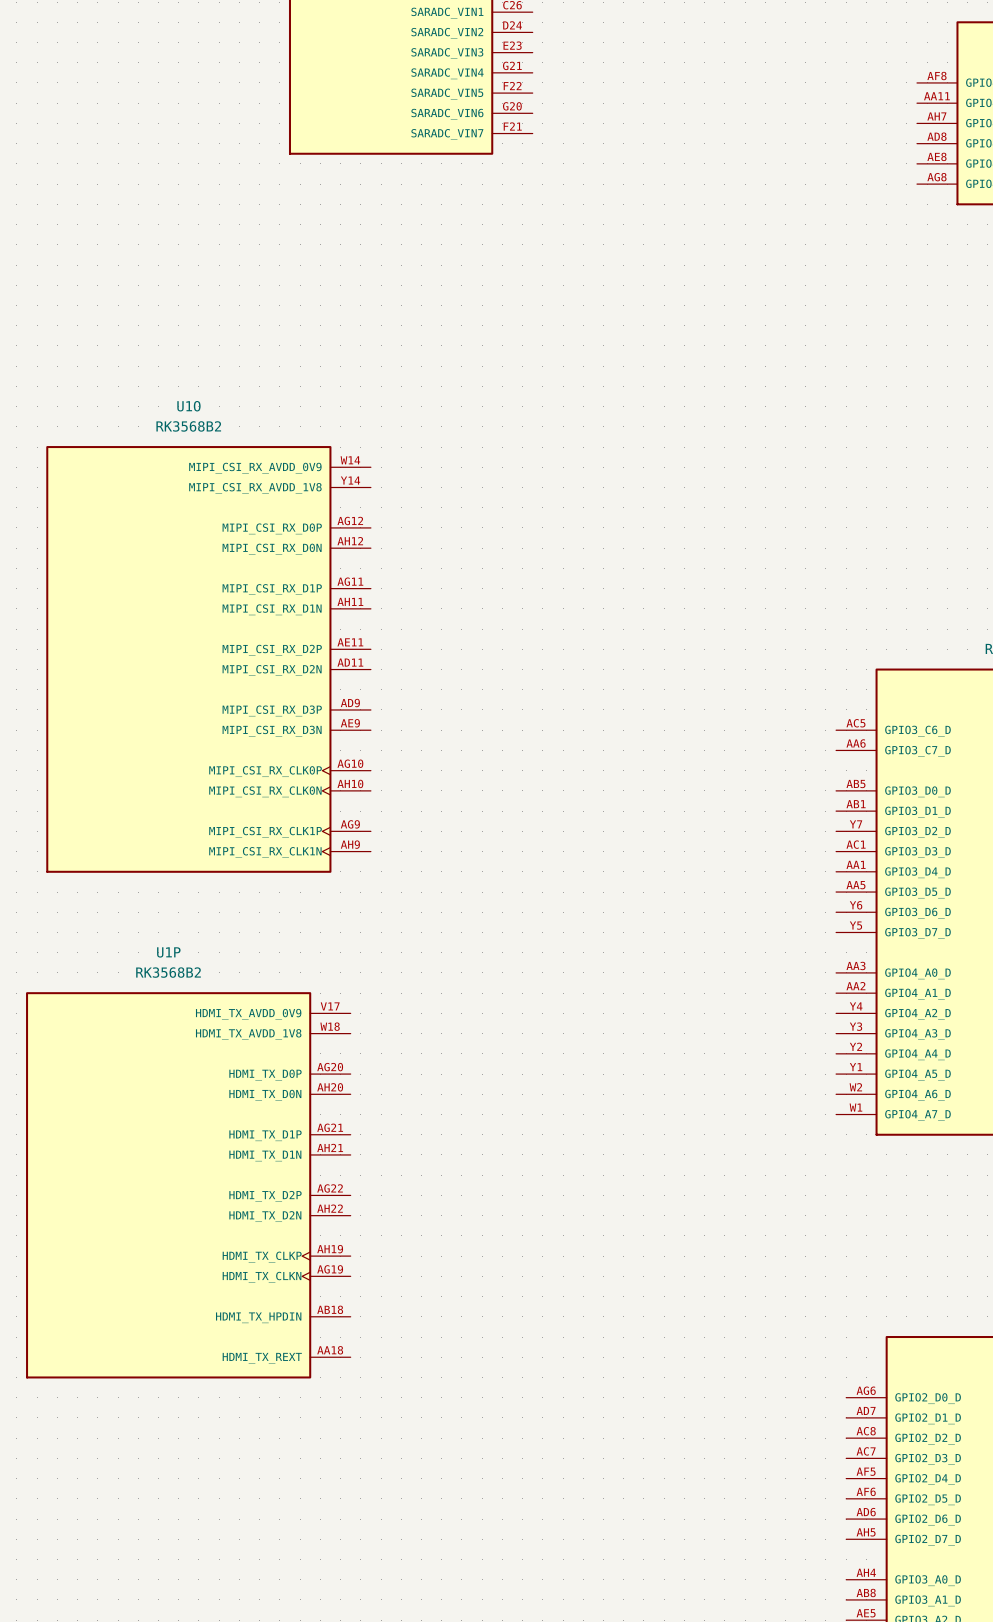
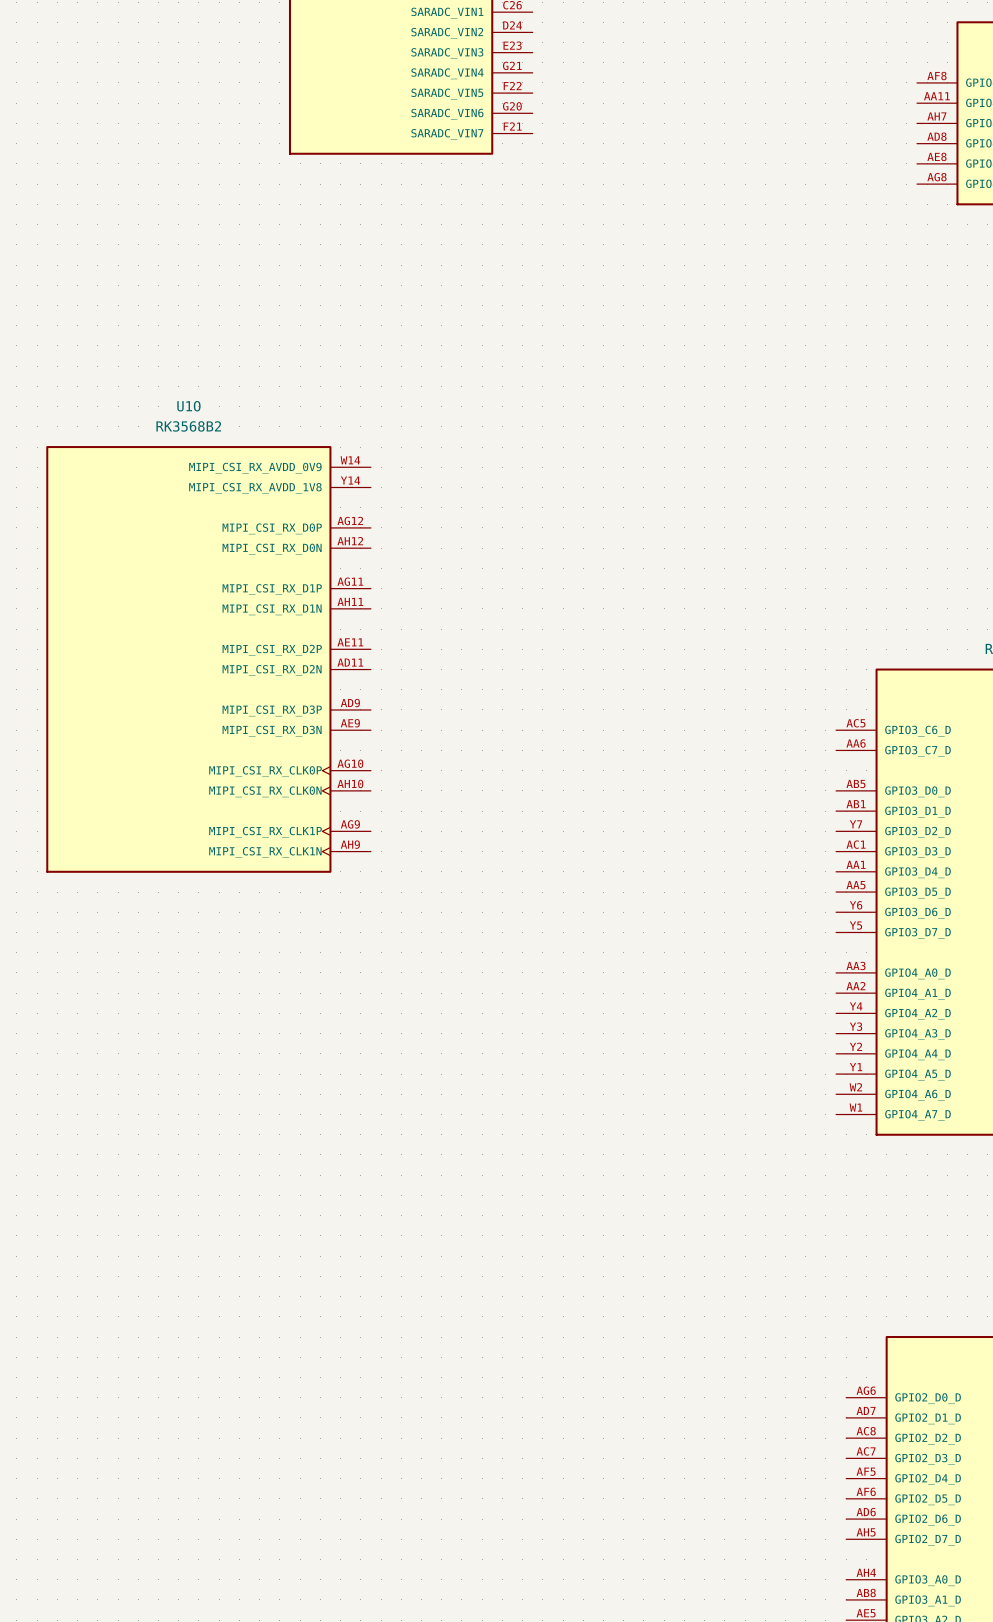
U1P: RK3568B2 (188, 1185) -> none

